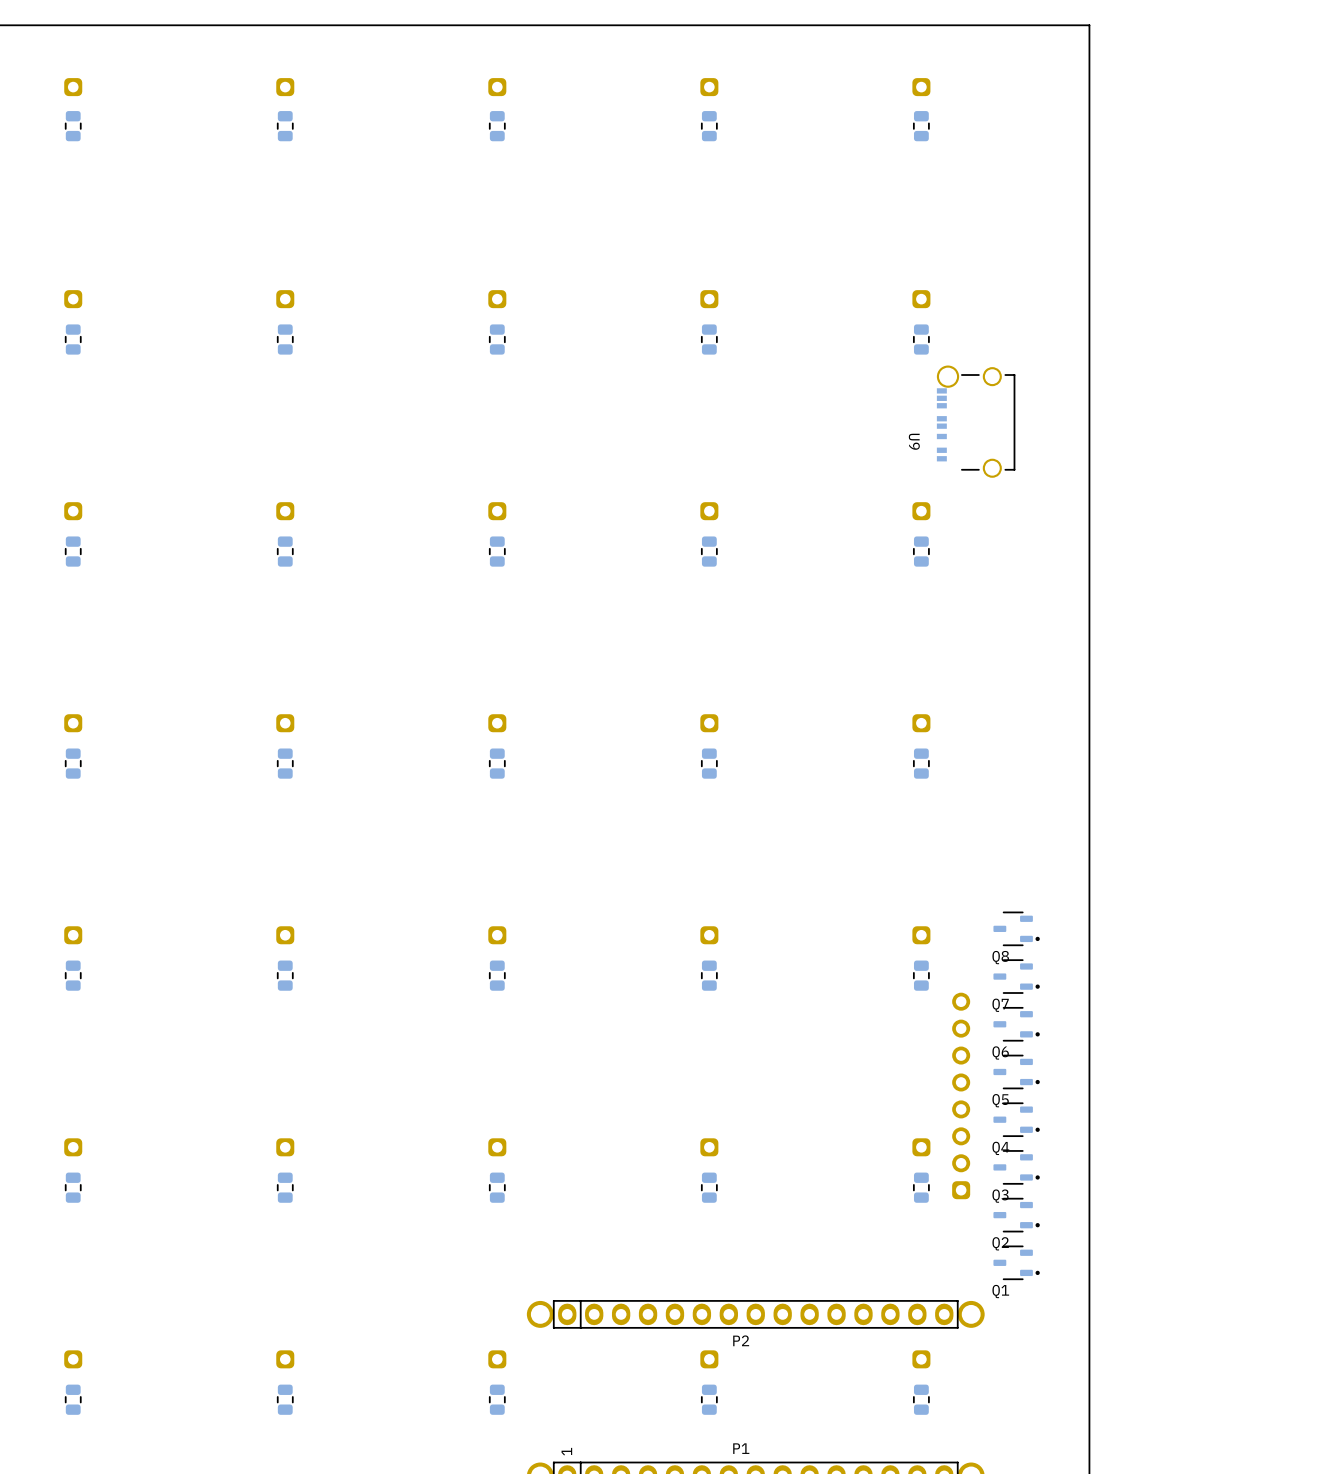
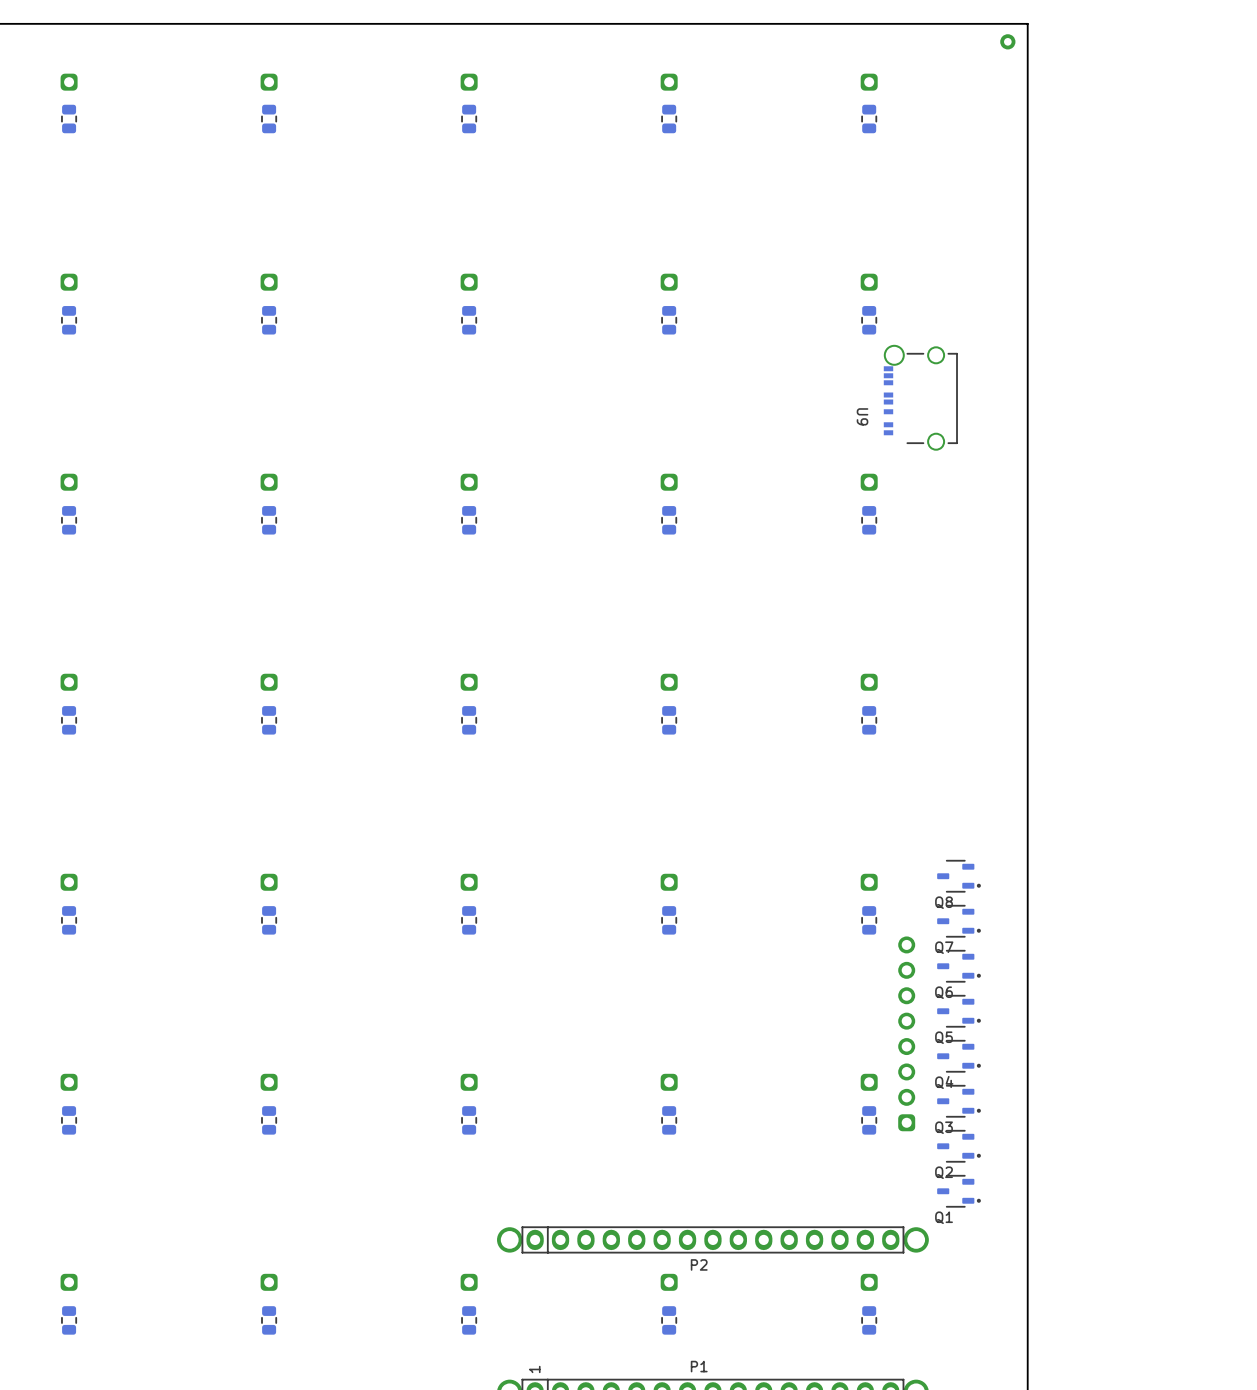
part: none -> (1007, 41)

